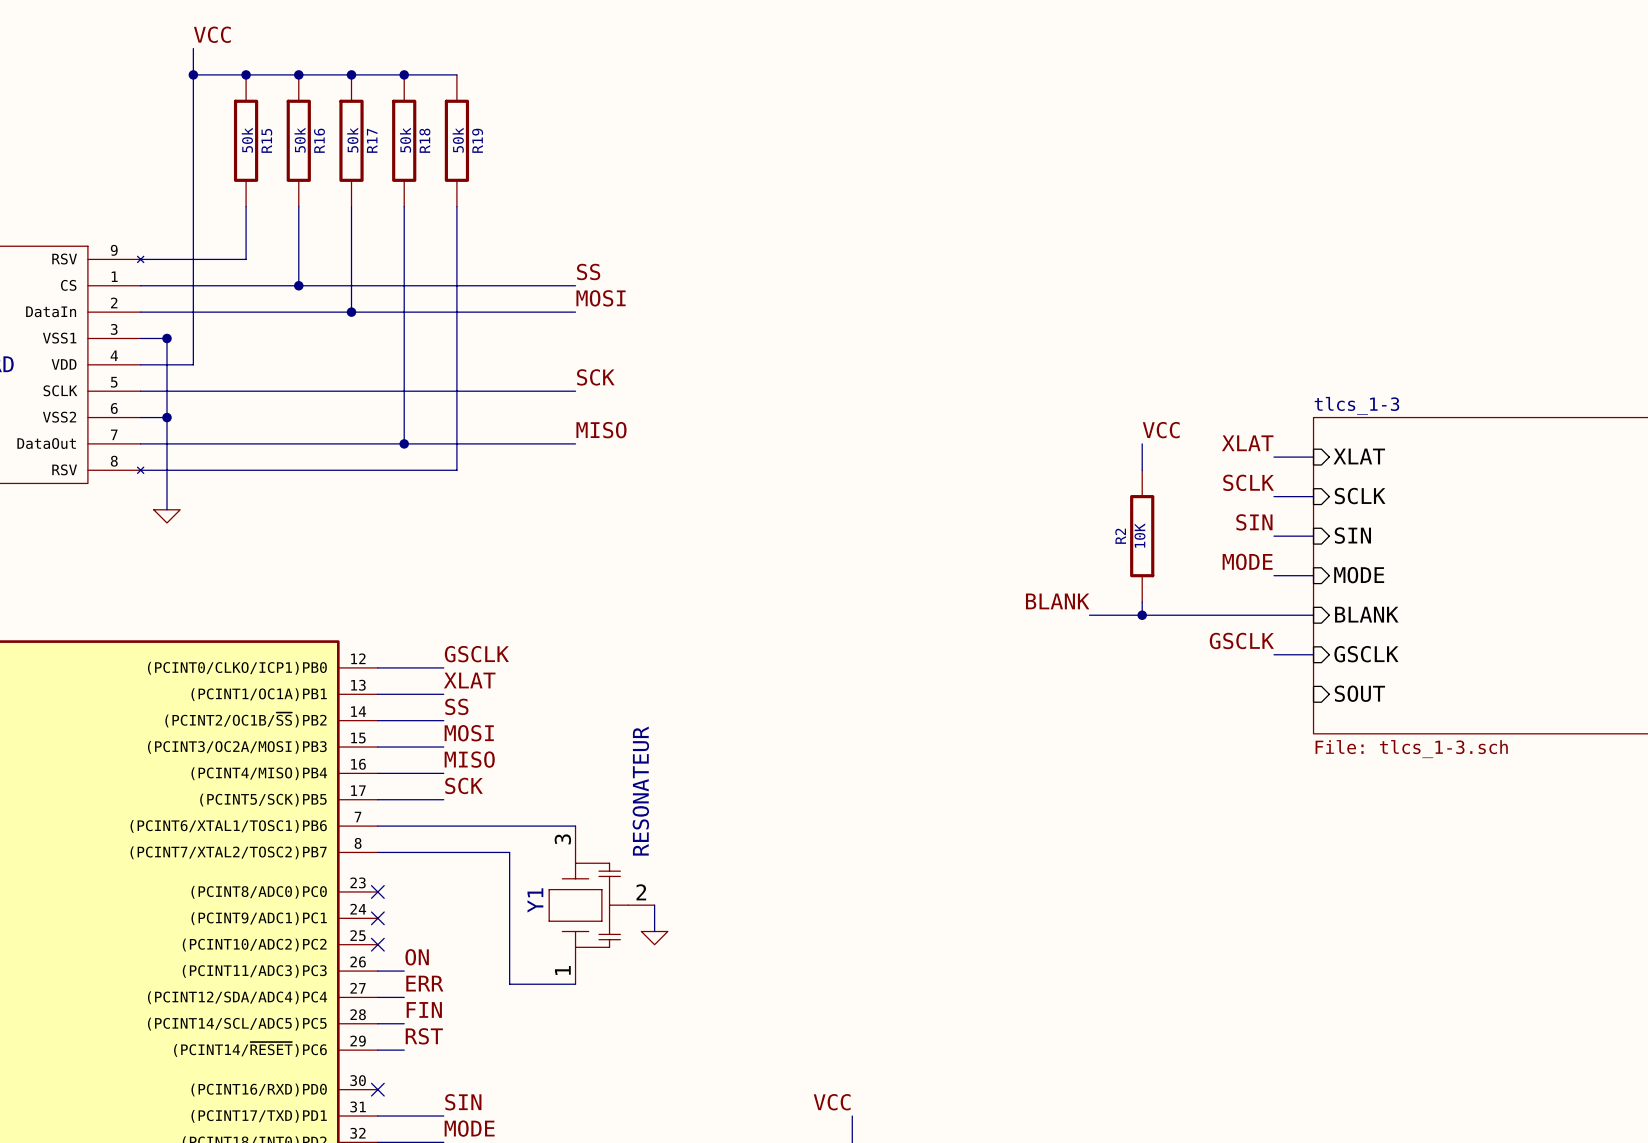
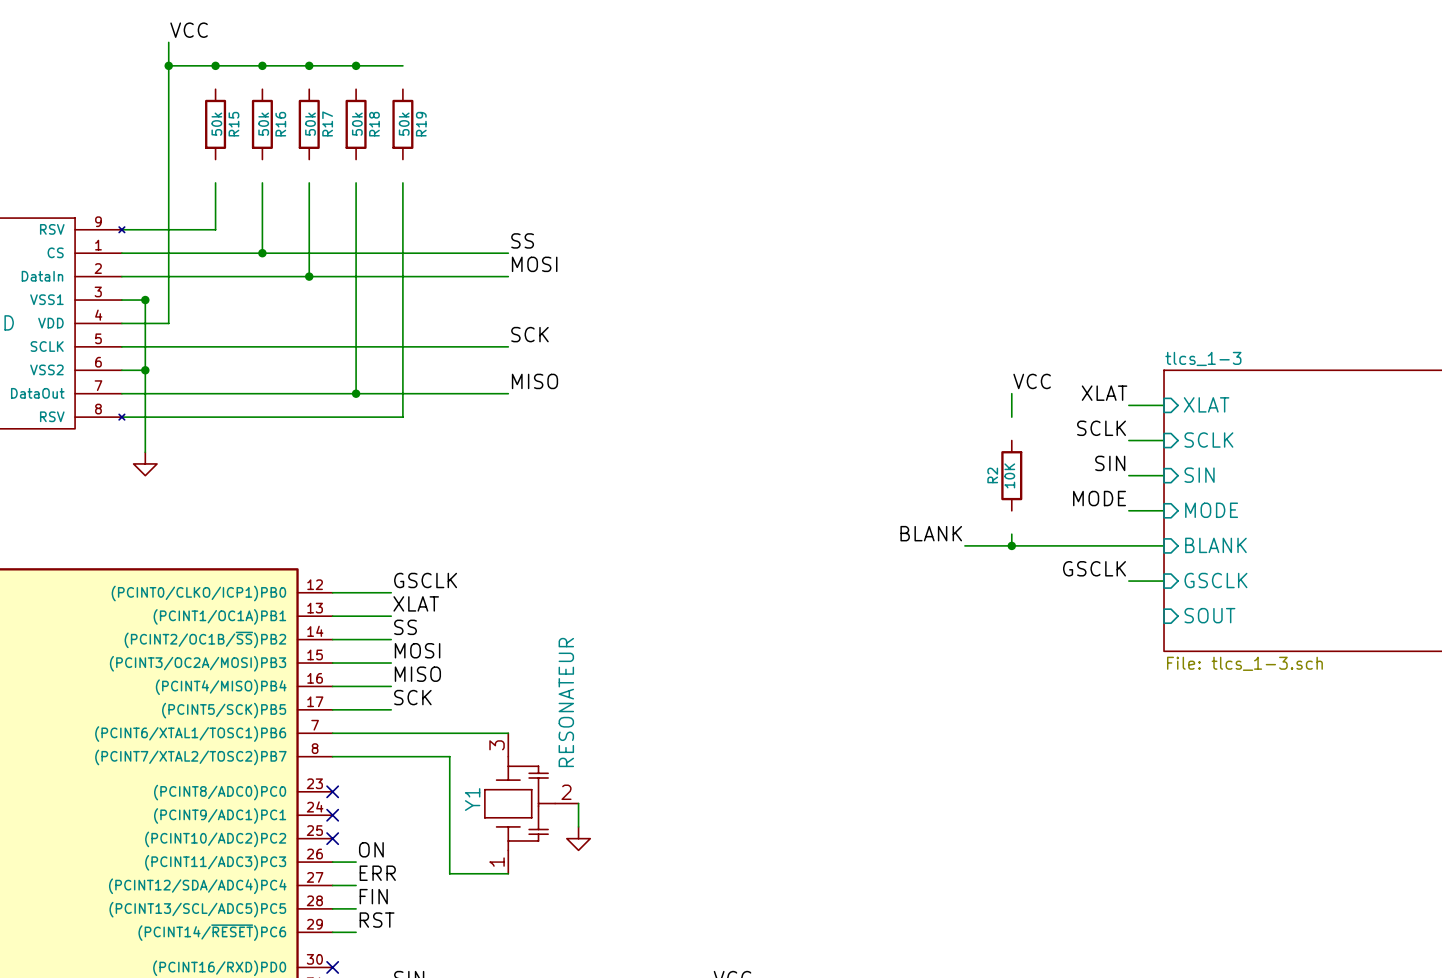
R15 symbol: [233, 74, 259, 207] -> [205, 89, 227, 160]
R16 symbol: [286, 74, 311, 207] -> [251, 89, 273, 160]
R17 symbol: [339, 74, 364, 207] -> [298, 89, 320, 160]
R18 symbol: [392, 74, 417, 207] -> [345, 89, 367, 160]
R19 symbol: [444, 74, 470, 207] -> [392, 89, 414, 160]
R2 symbol: [1130, 470, 1155, 603] -> [1001, 440, 1023, 511]
power symbol shape: [153, 509, 181, 523] -> [133, 452, 158, 476]
power symbol shape: [641, 931, 668, 945] -> [566, 826, 591, 851]
part pin name: (PCINT14/SCL/ADC5)PC5 (237, 1024) -> (PCINT13/SCL/ADC5)PC5 (197, 909)

